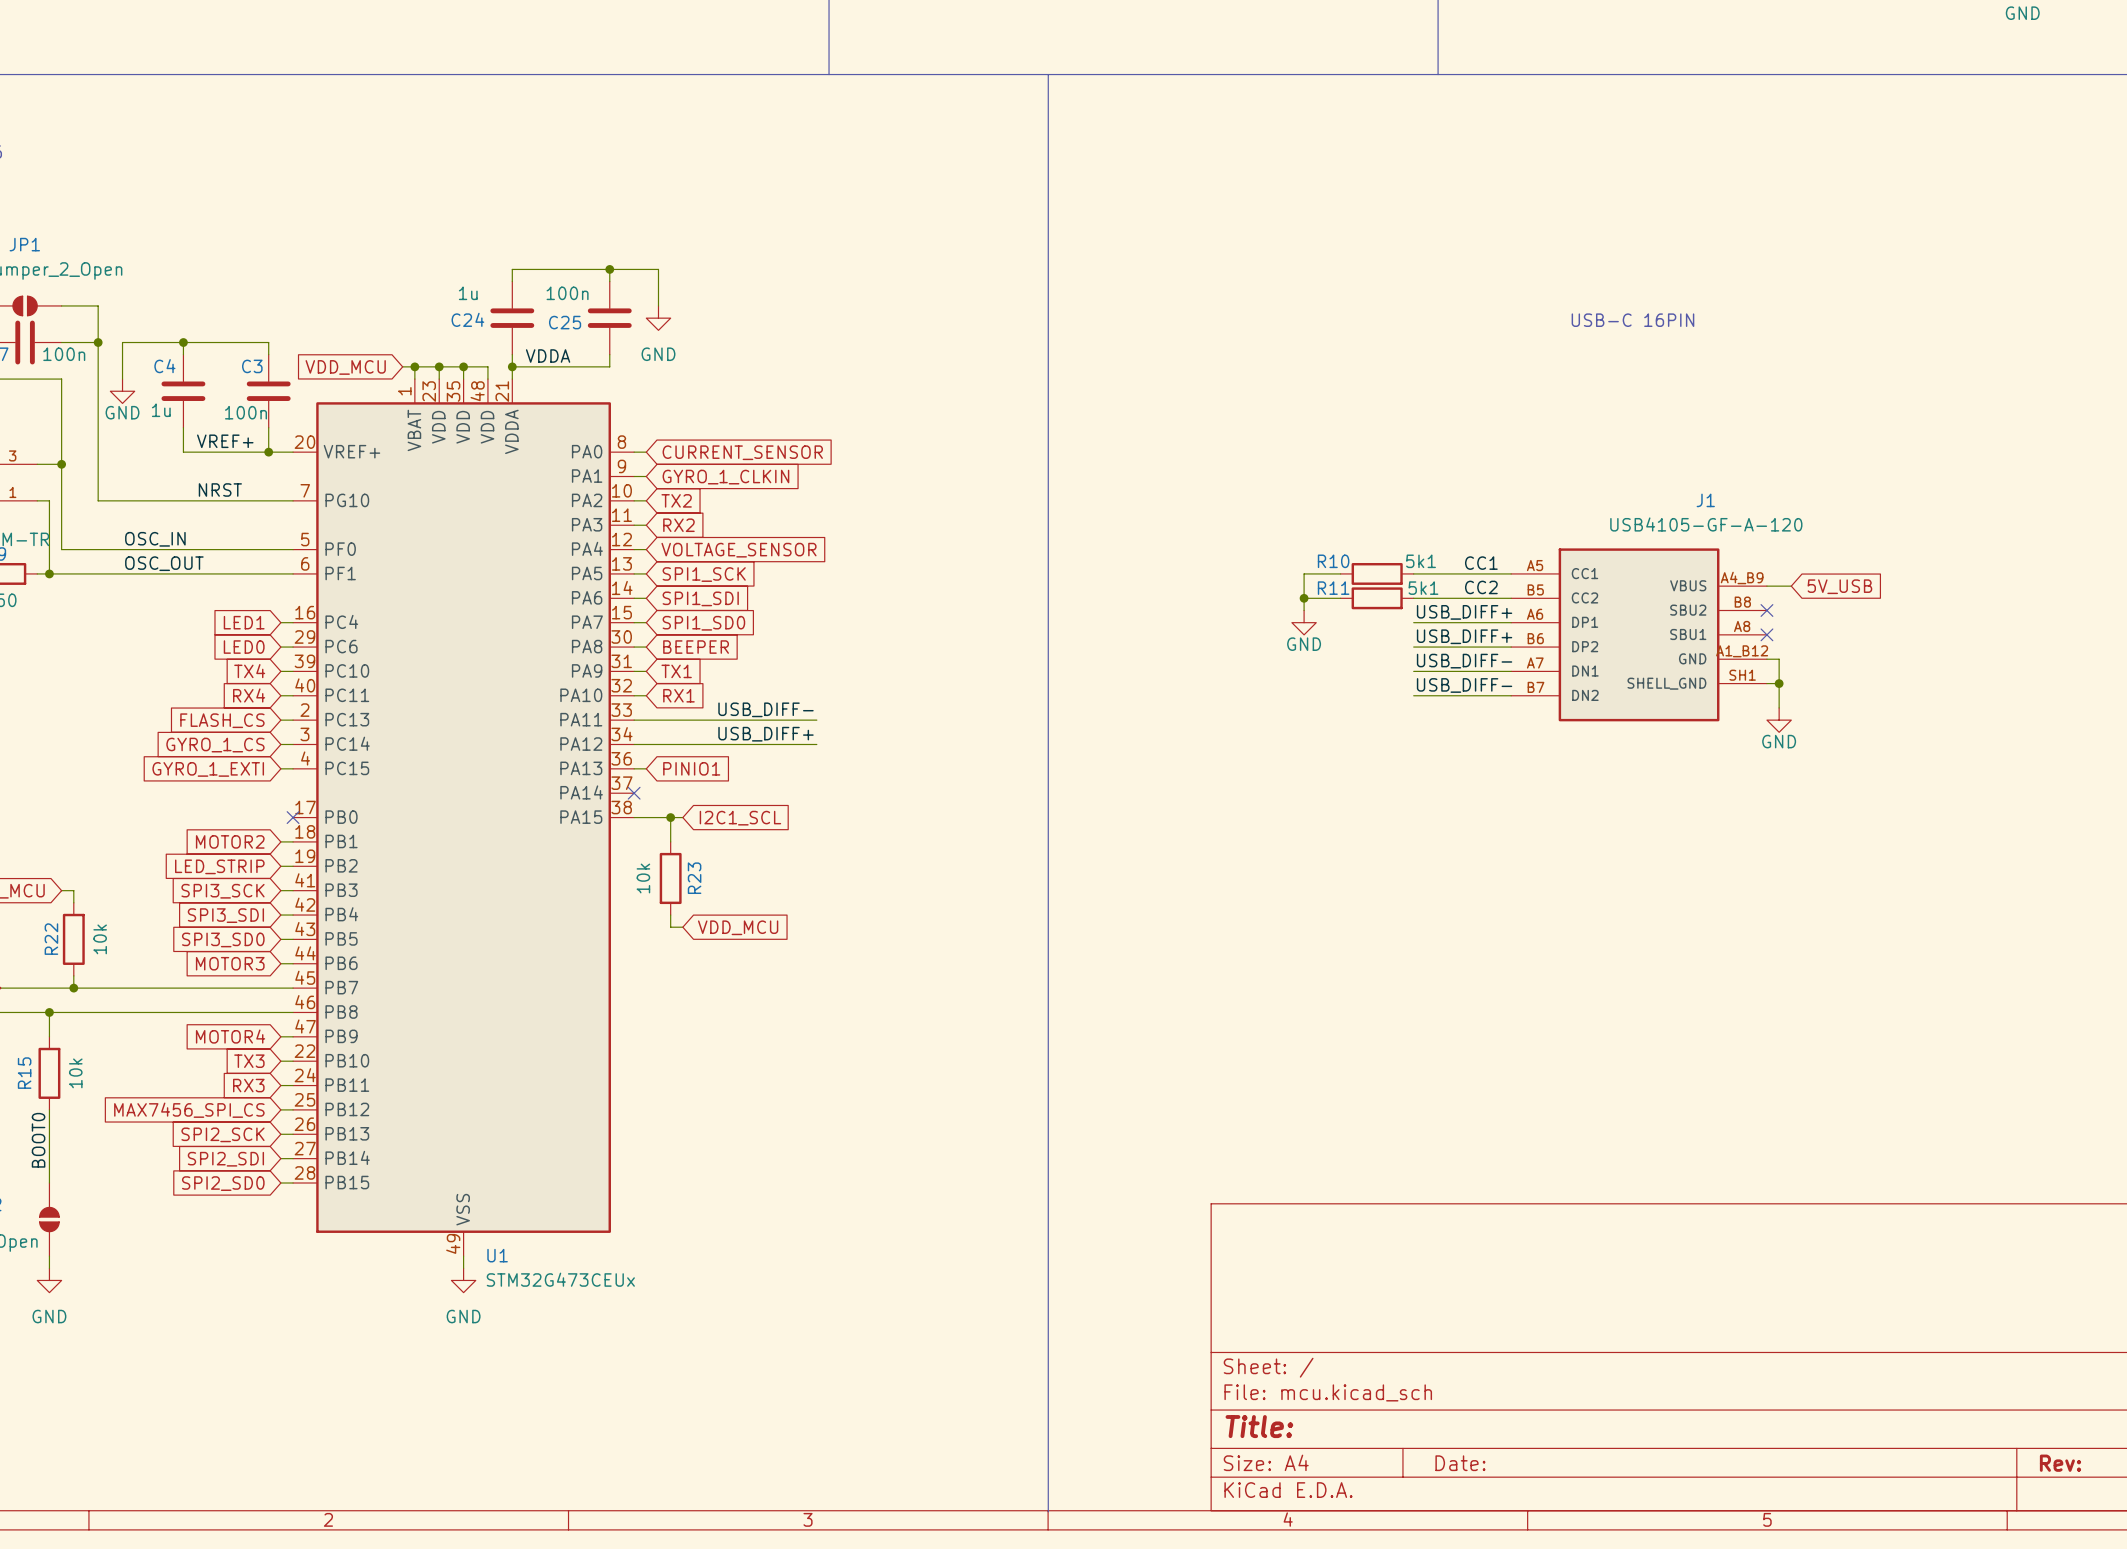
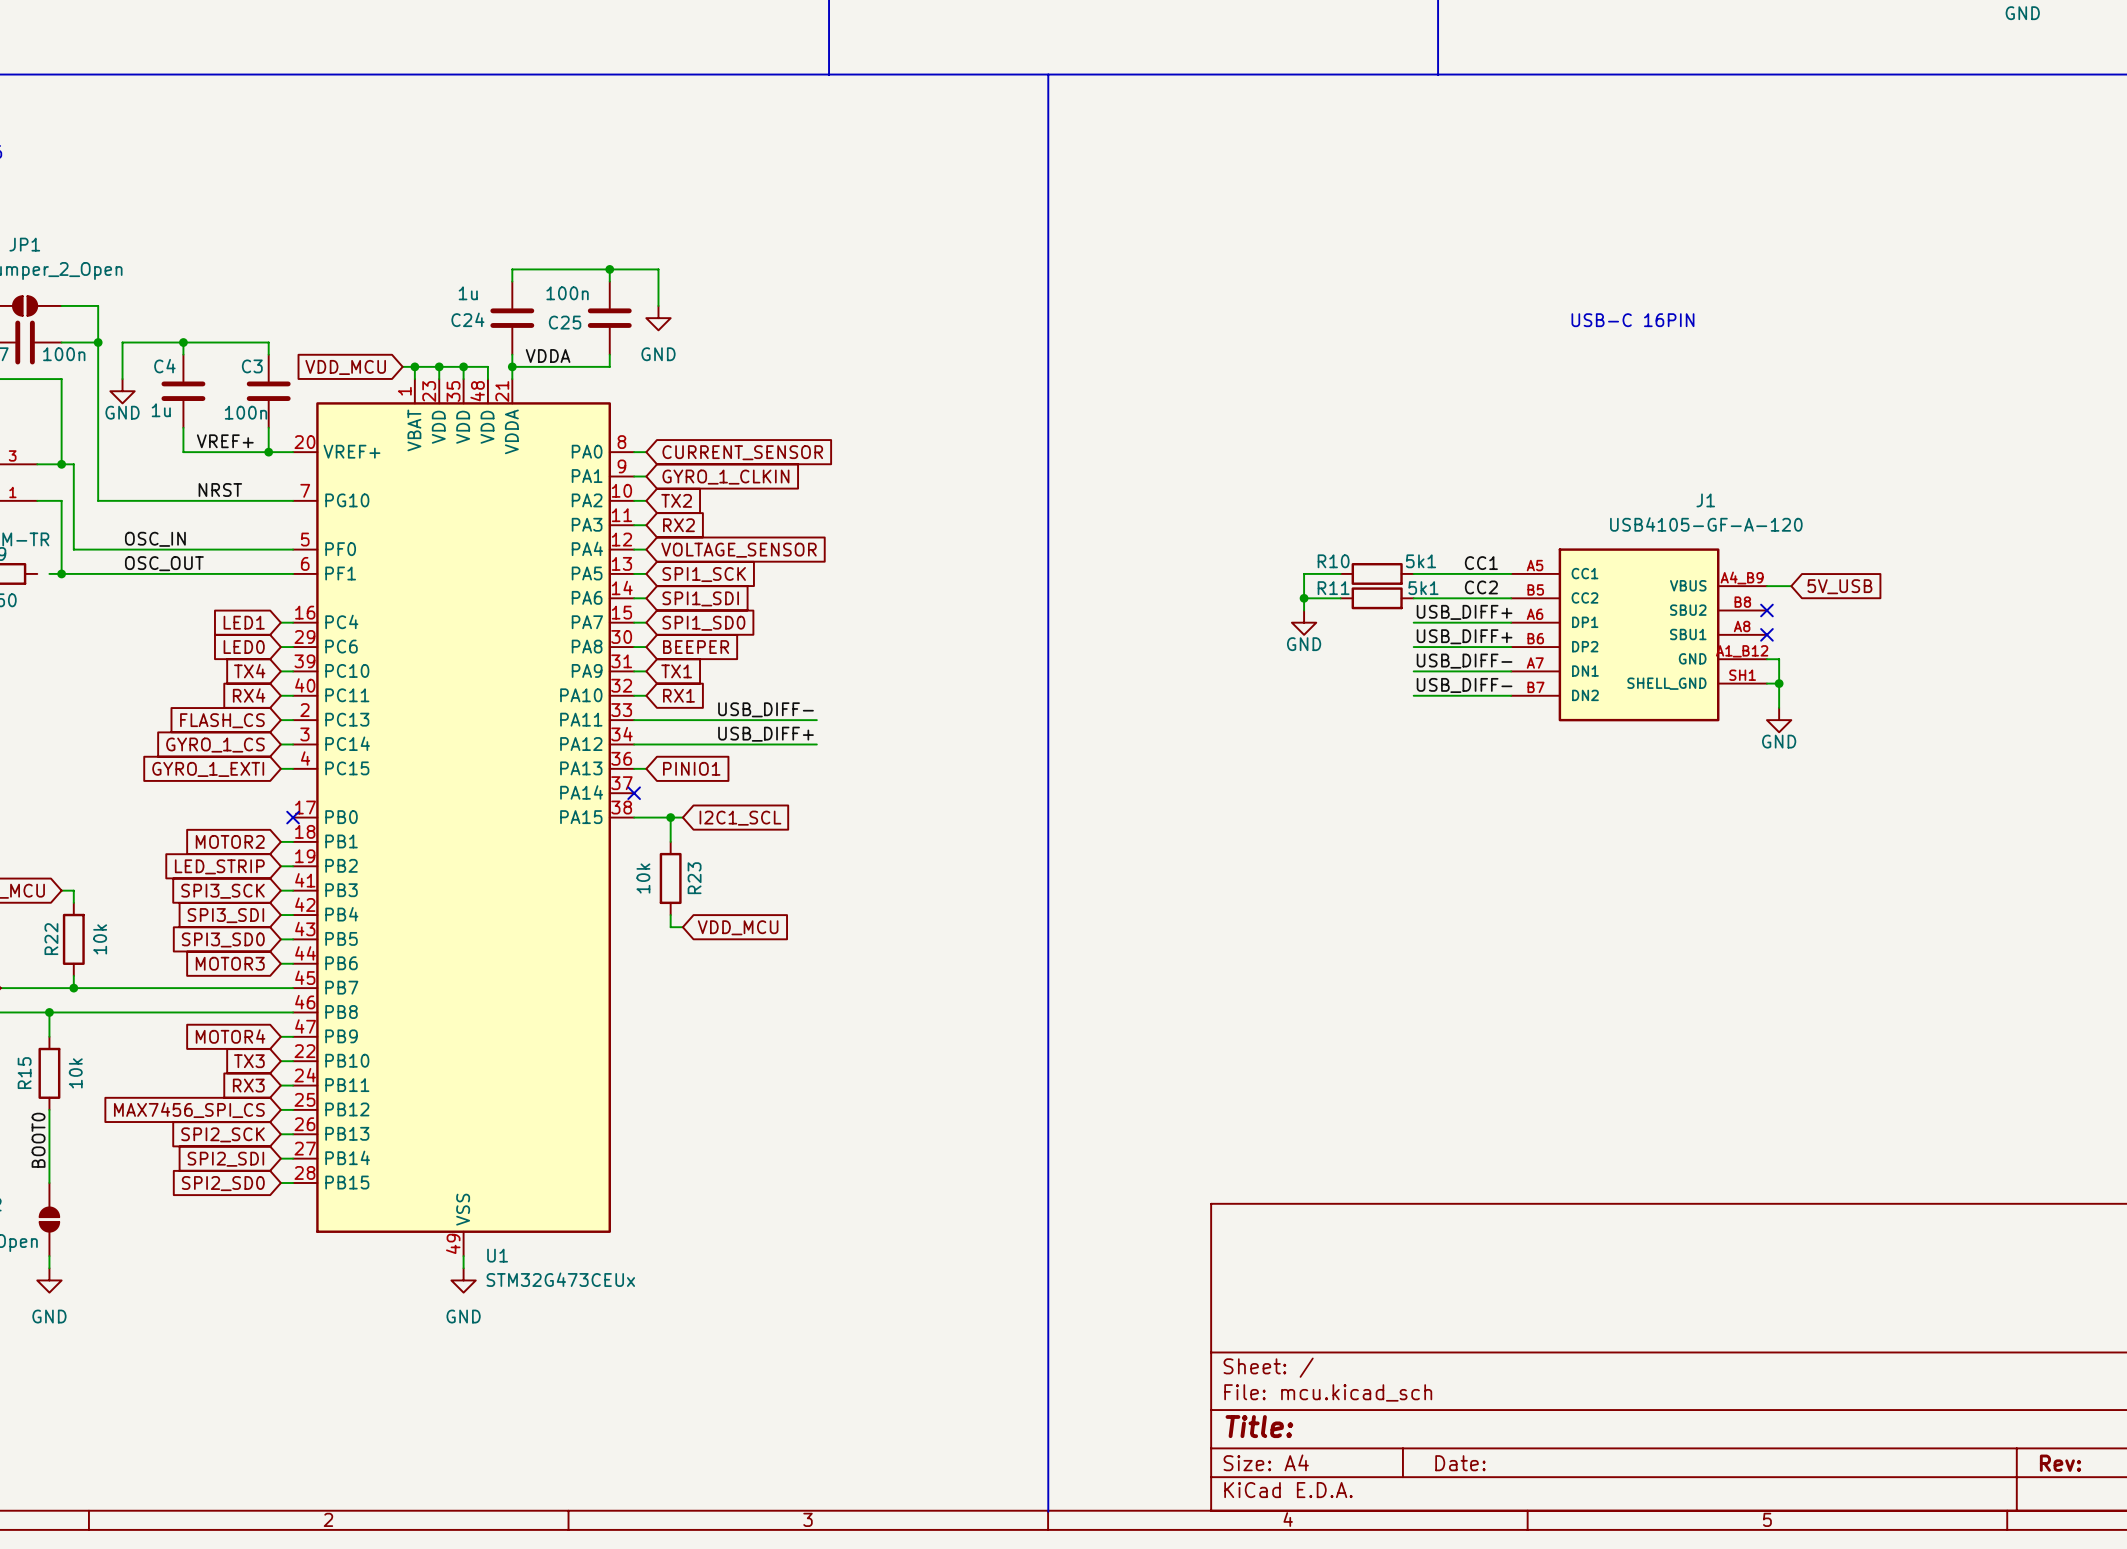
wire: (61, 464) (61, 500) -> (49, 500) (61, 500)
wire: none -> (61, 464) (73, 464) (73, 549)
wire: (49, 500) (49, 573) (37, 573) -> none
wire: (61, 549) (73, 549) -> (61, 549) (61, 573)
junction position: (49, 573) -> (61, 573)

